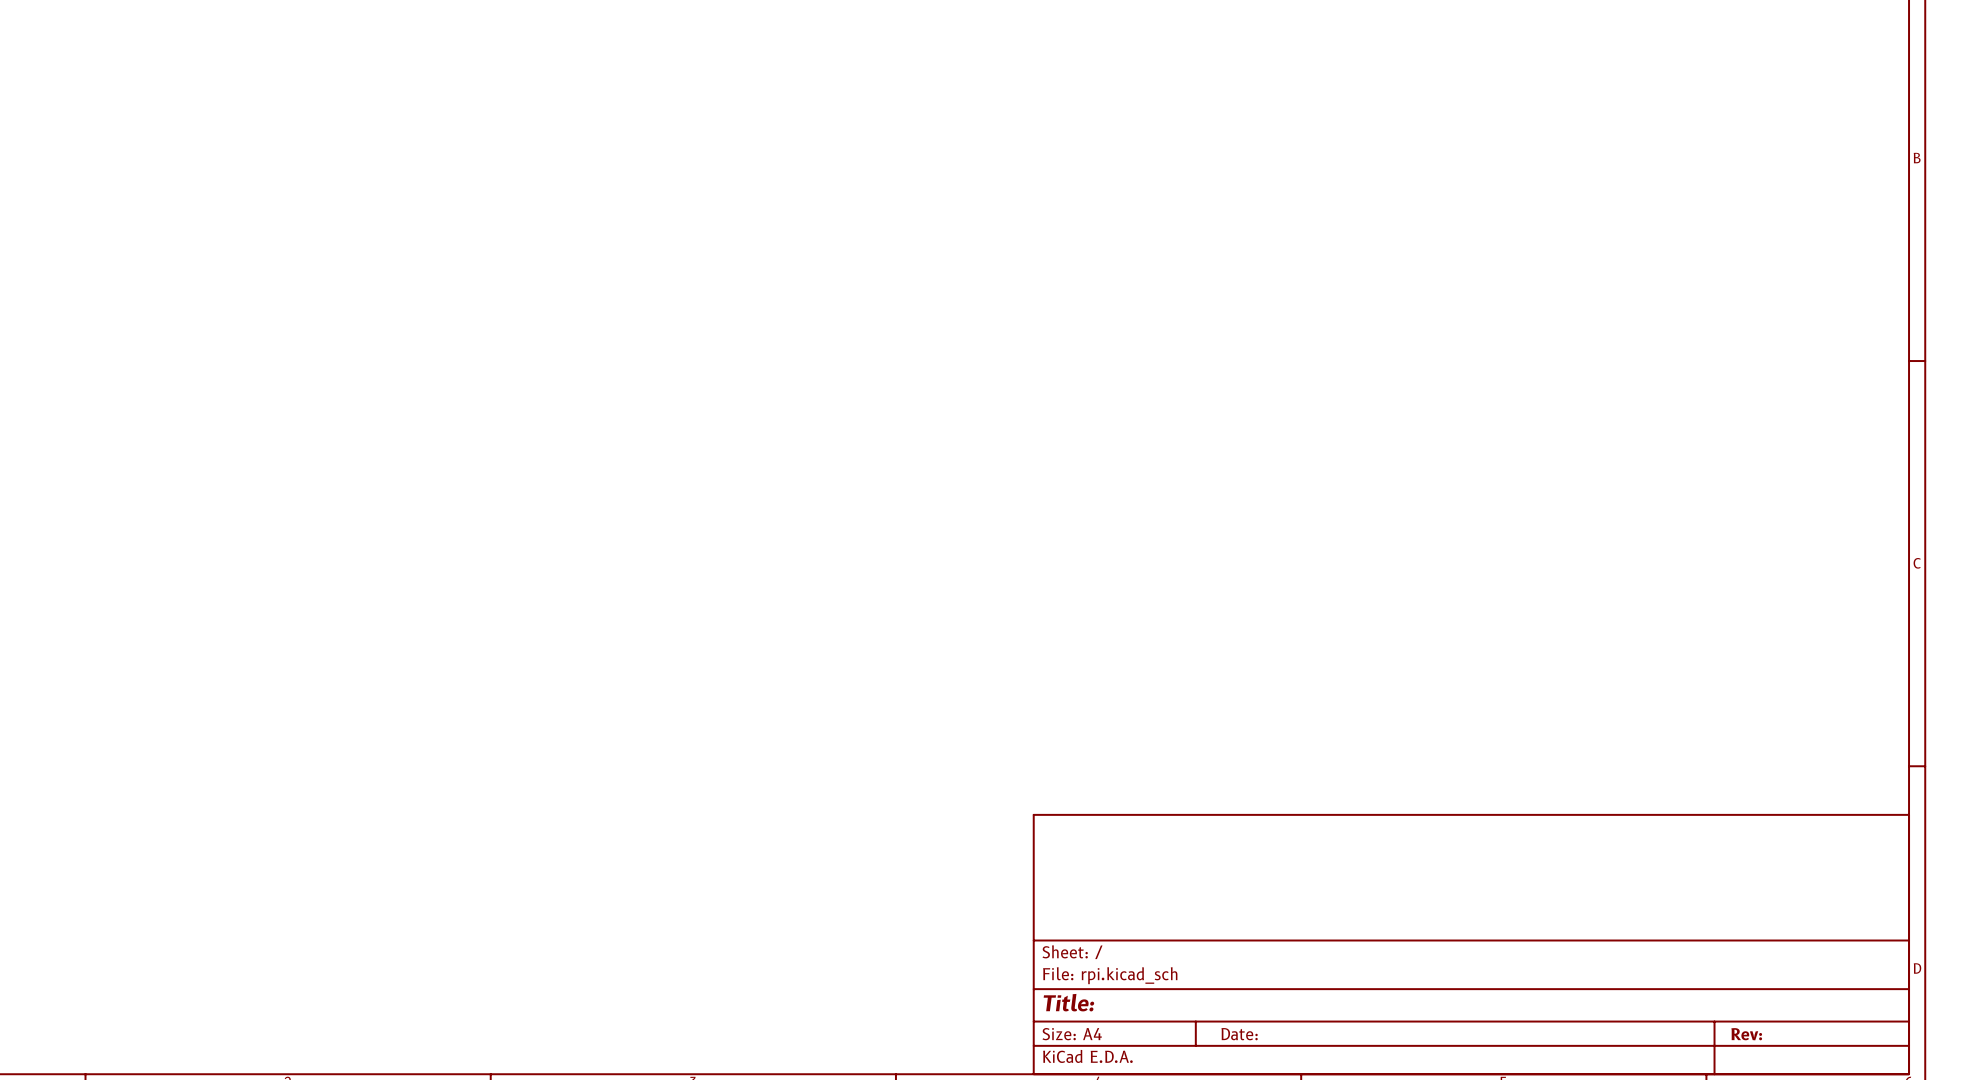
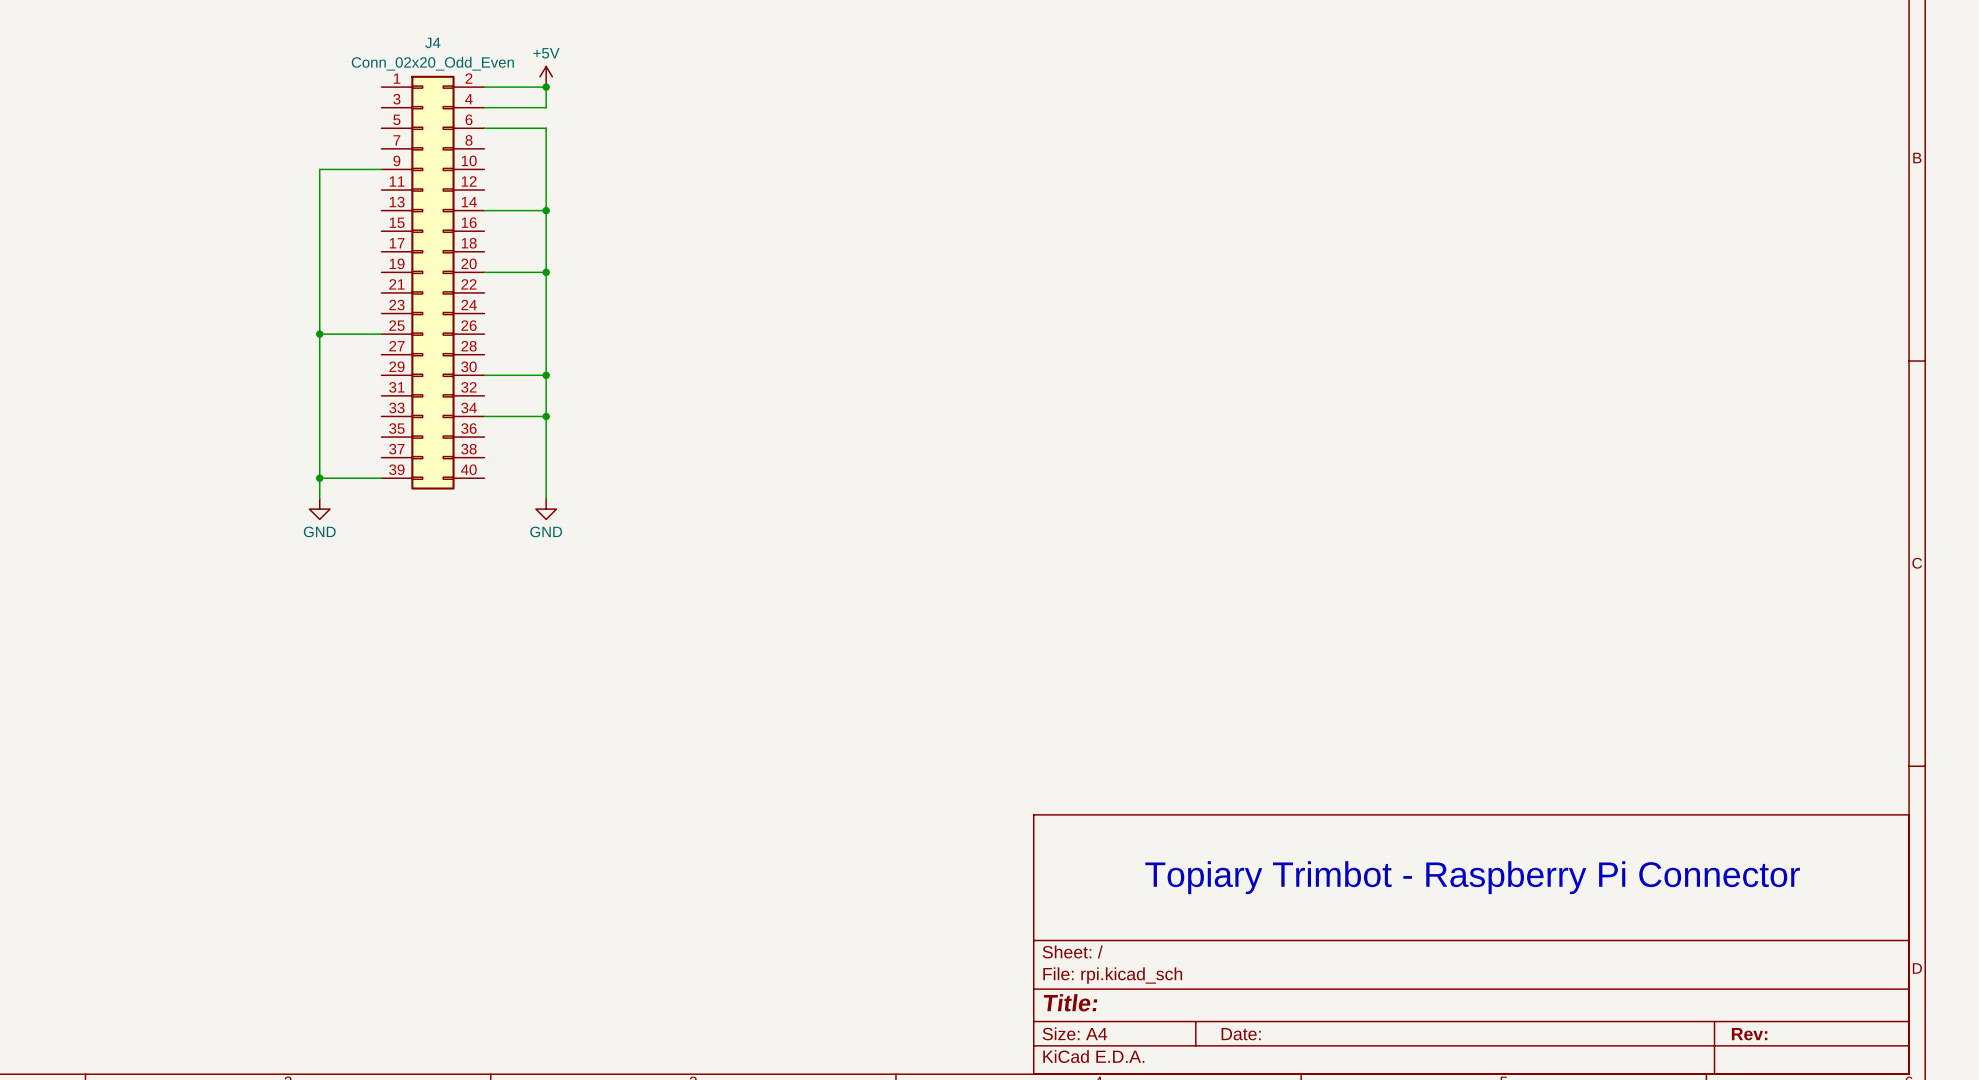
power symbol: none -> +5V (546, 76)
wire: none -> (484, 87) (546, 87) (546, 107) (484, 107)
junction: none -> (546, 87)
wire: none -> (484, 128) (546, 128) (546, 498)
wire: none -> (381, 169) (319, 169) (319, 498)
wire: none -> (484, 210) (546, 210)
junction: none -> (546, 210)
wire: none -> (484, 272) (546, 272)
junction: none -> (546, 272)
J4: none -> Conn_02x20_Odd_Even (432, 282)
wire: none -> (319, 334) (381, 334)
junction: none -> (319, 334)
wire: none -> (484, 375) (546, 375)
junction: none -> (546, 375)
wire: none -> (484, 416) (546, 416)
junction: none -> (546, 416)
wire: none -> (319, 478) (381, 478)
junction: none -> (319, 478)
power symbol: none -> GND (319, 509)
power symbol: none -> GND (546, 509)
text: none -> Topiary Trimbot - Raspberry Pi Connector (1472, 877)

